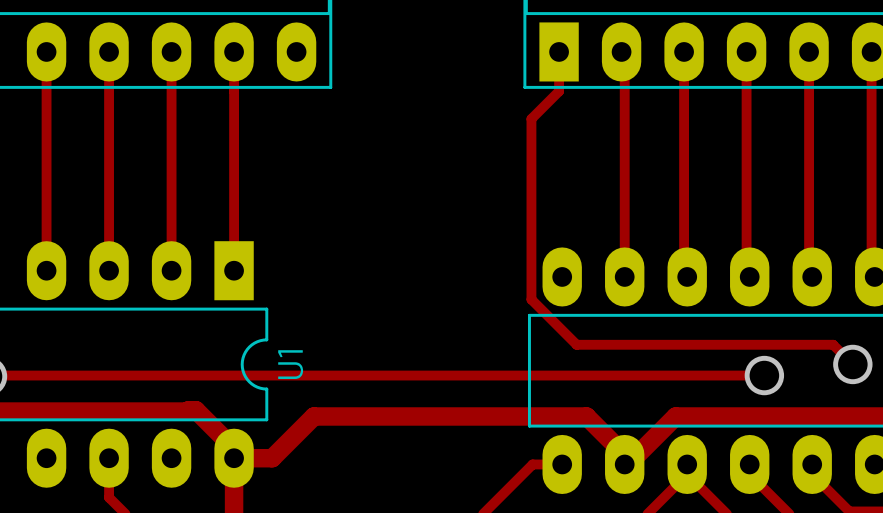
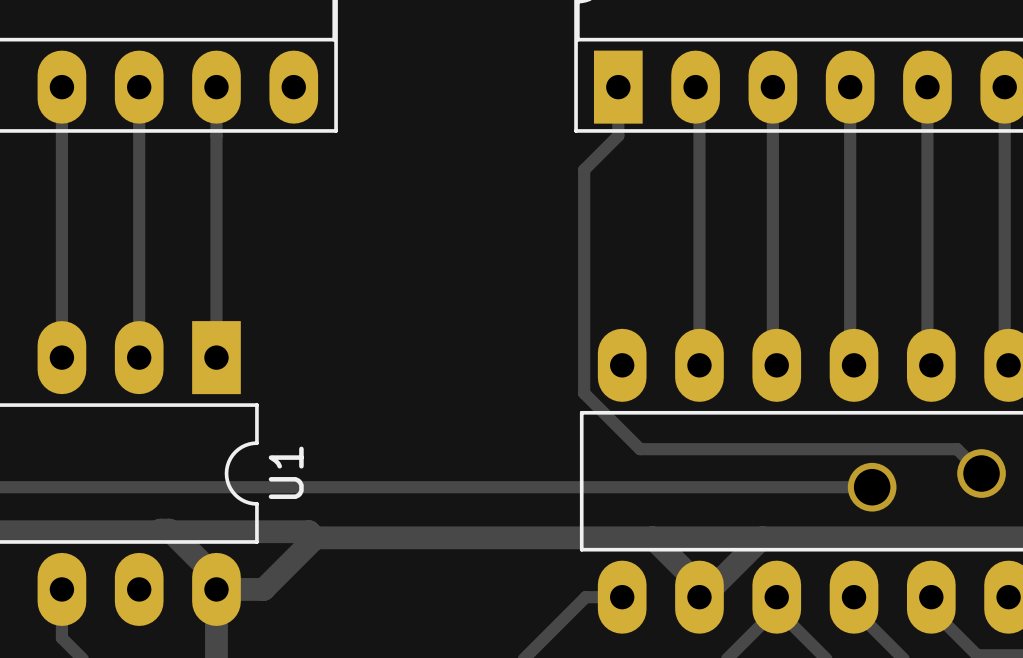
track: none -> (158, 531) (309, 531) (315, 537)
track: none -> (652, 537) (762, 537)

